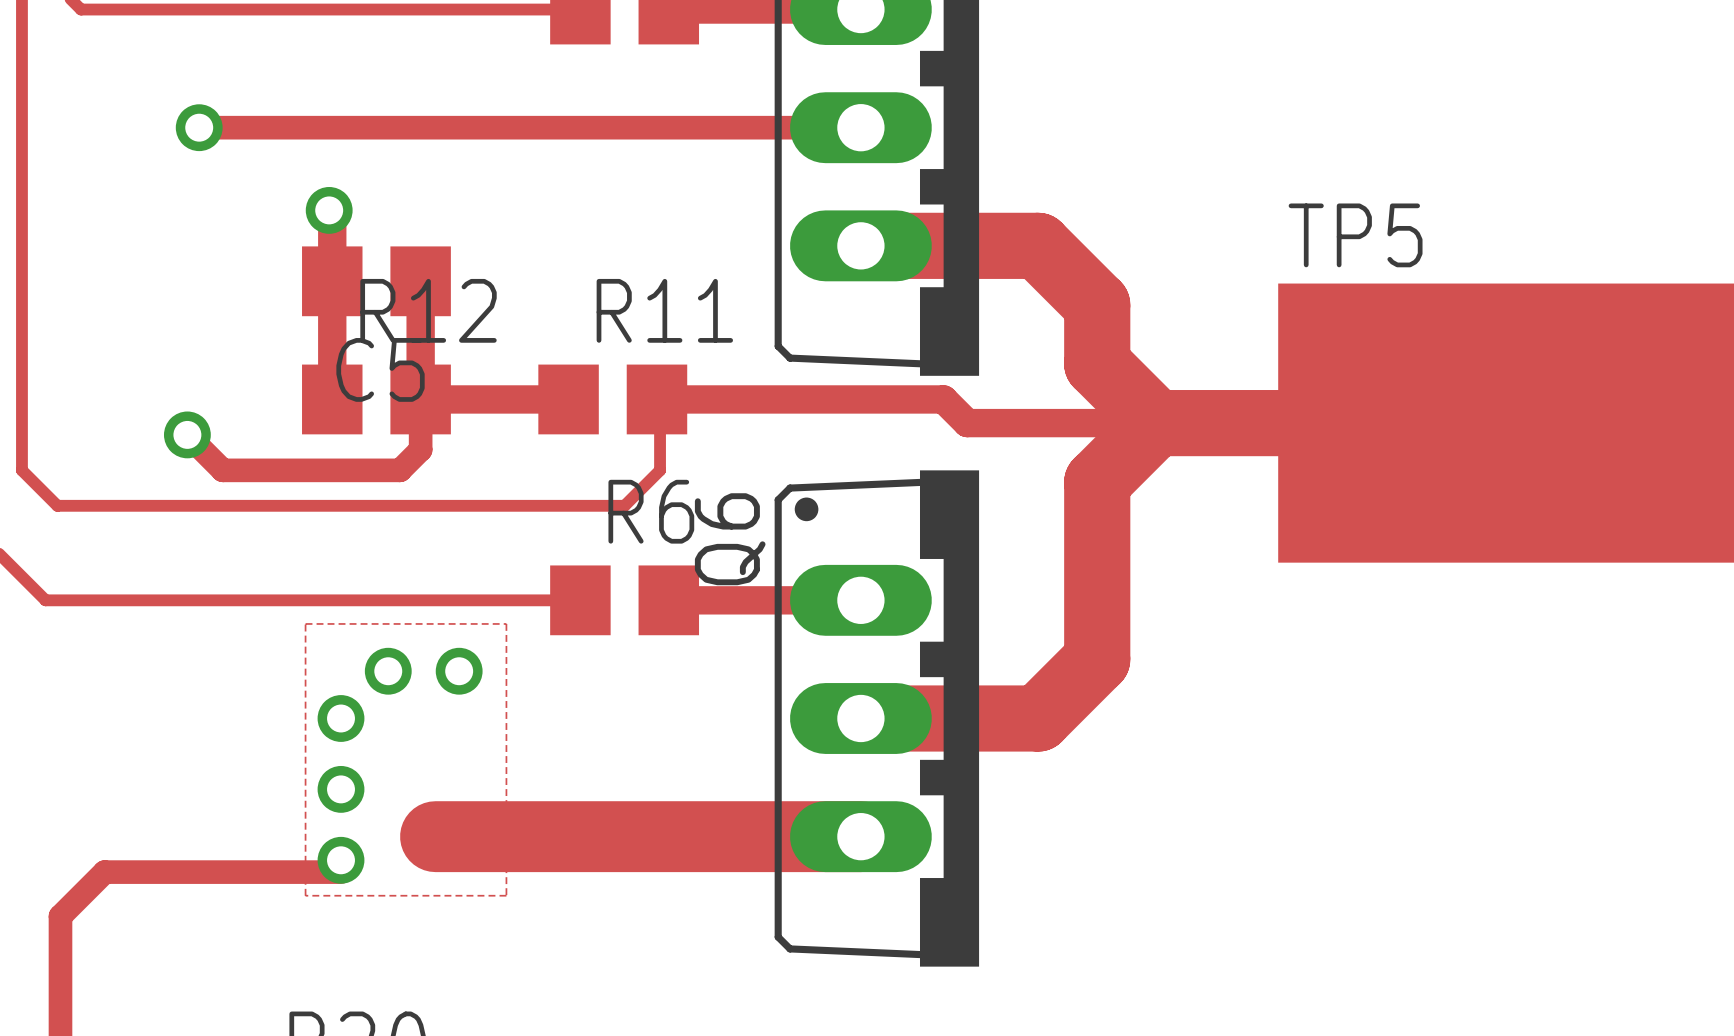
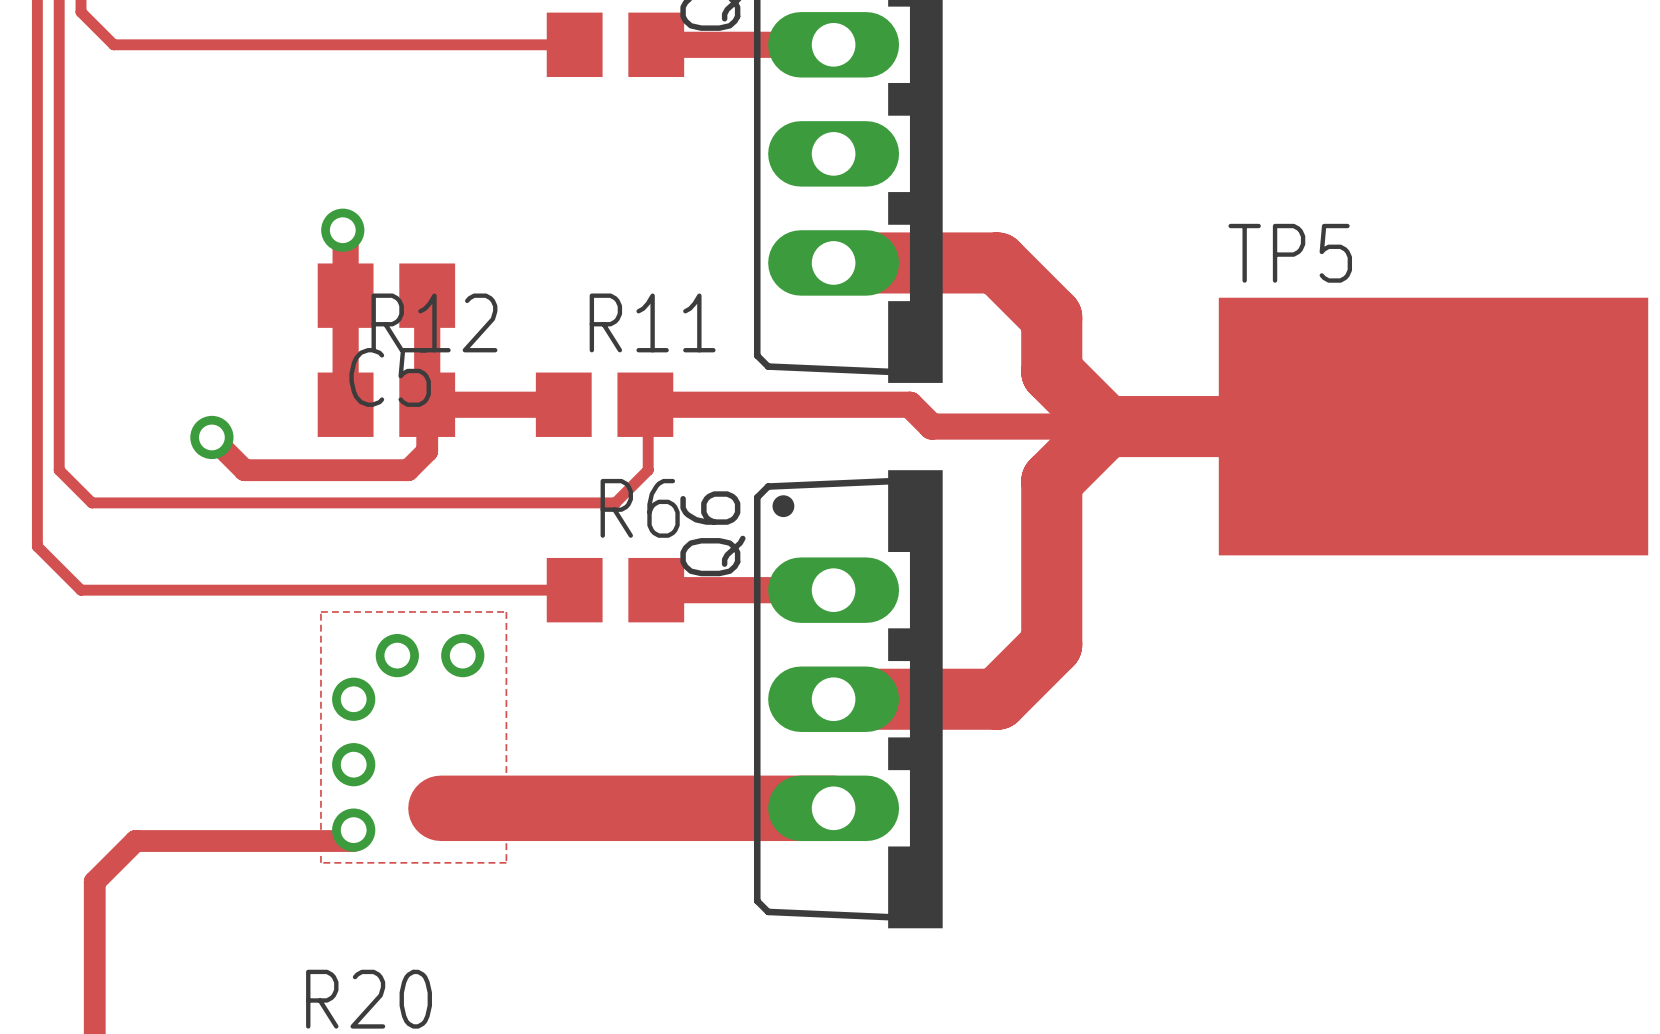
track: (199, 127) (860, 127) -> none
via: (199, 127) -> none

